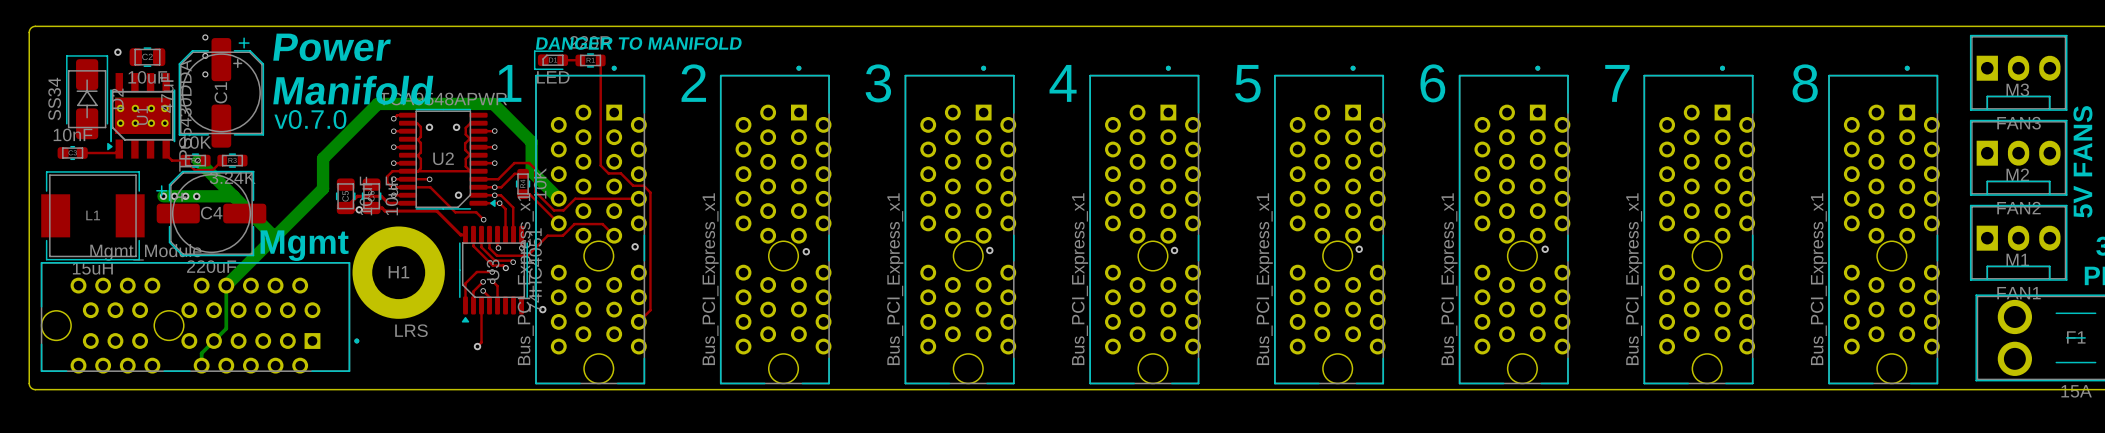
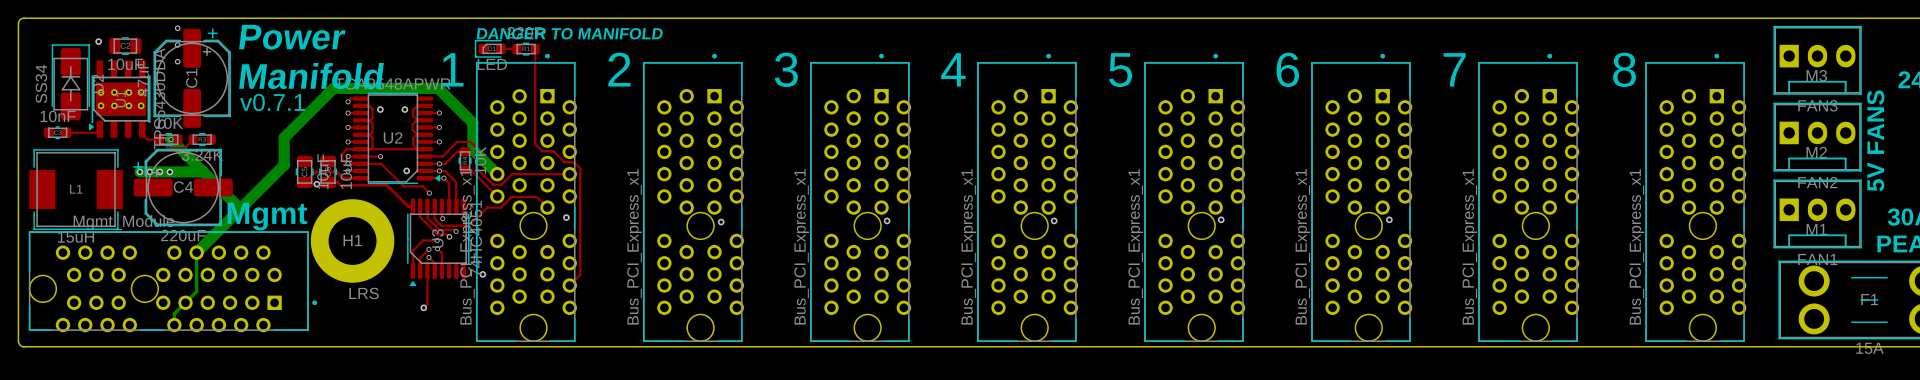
text: v0.7.0 (310, 119) -> v0.7.1 (272, 102)

